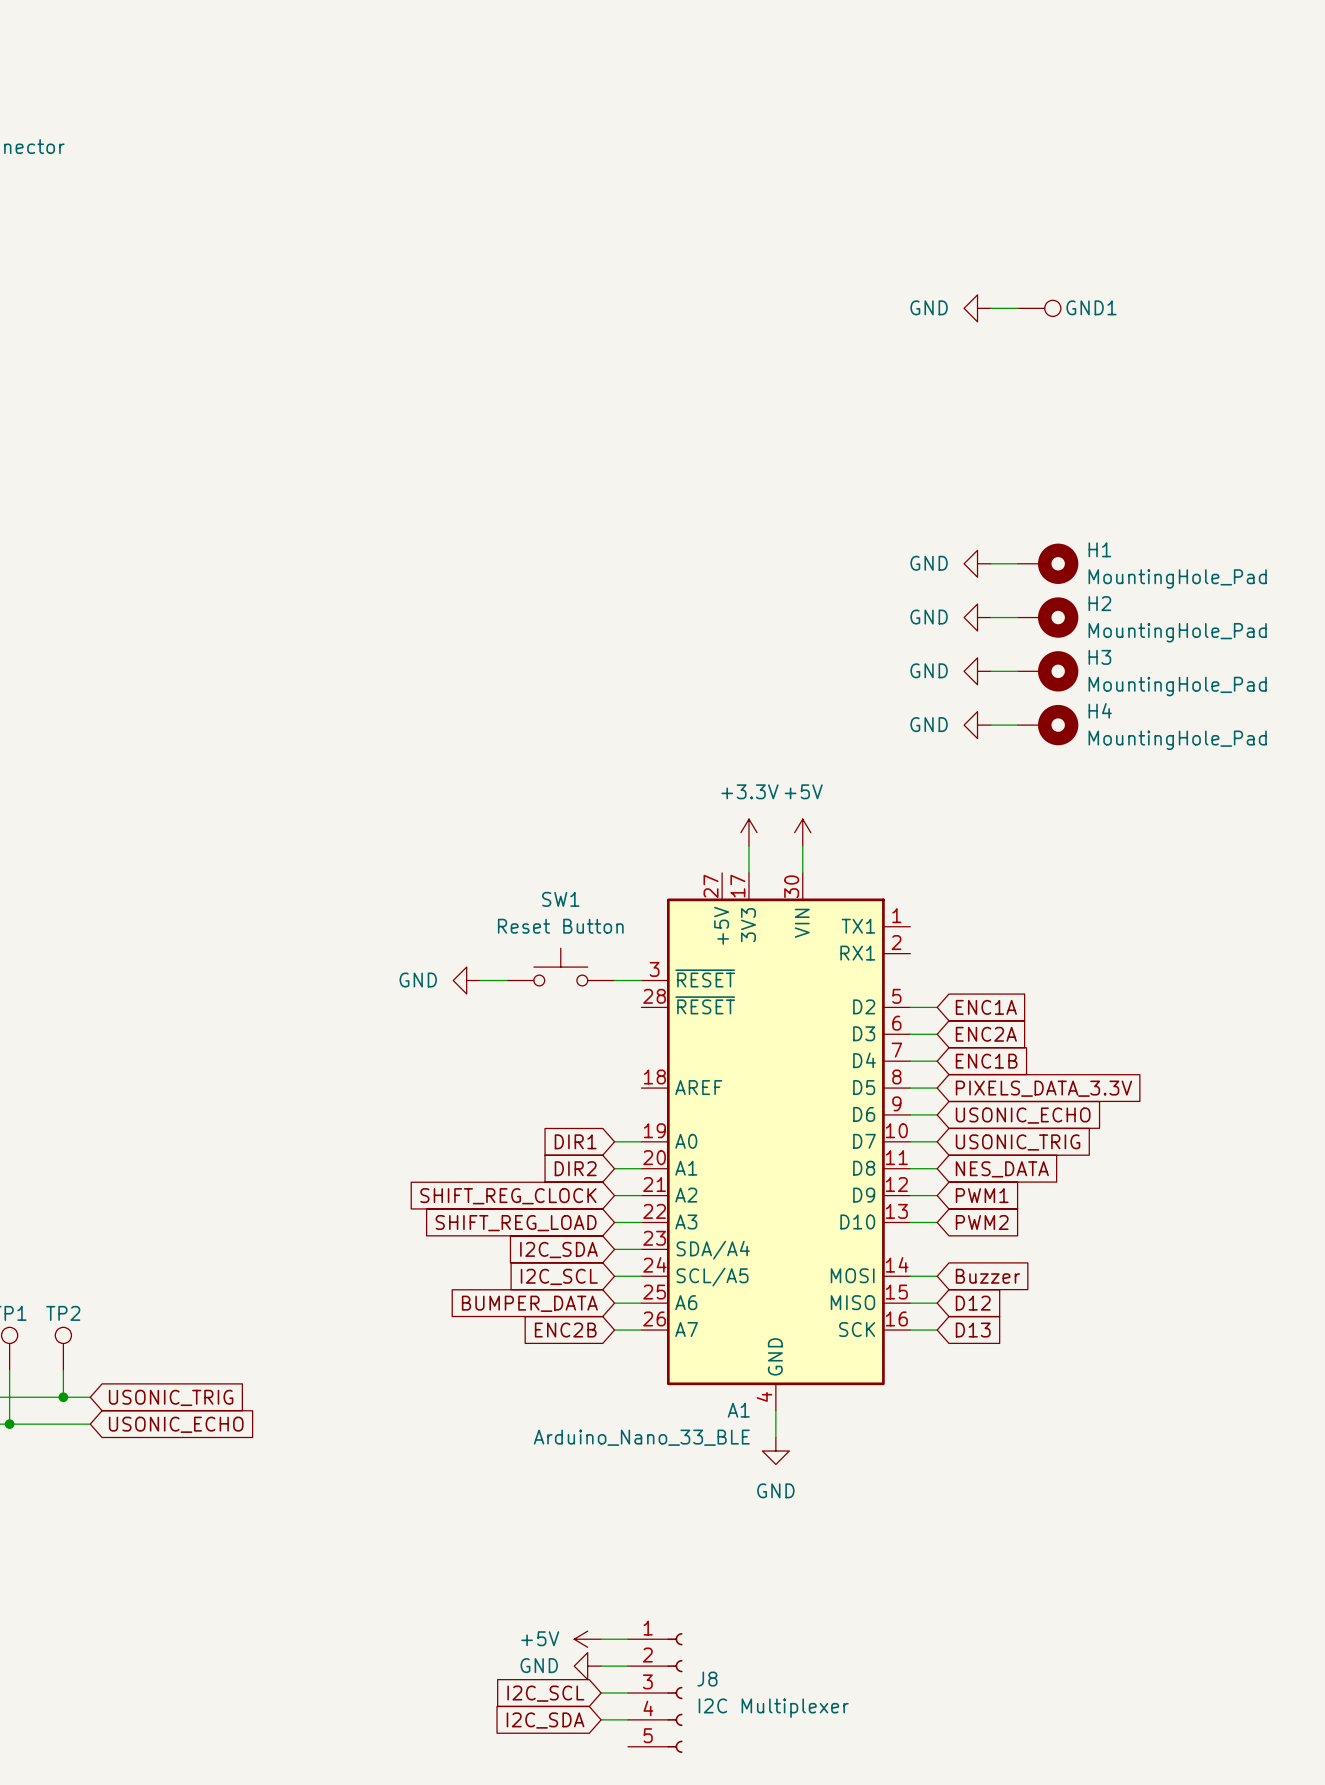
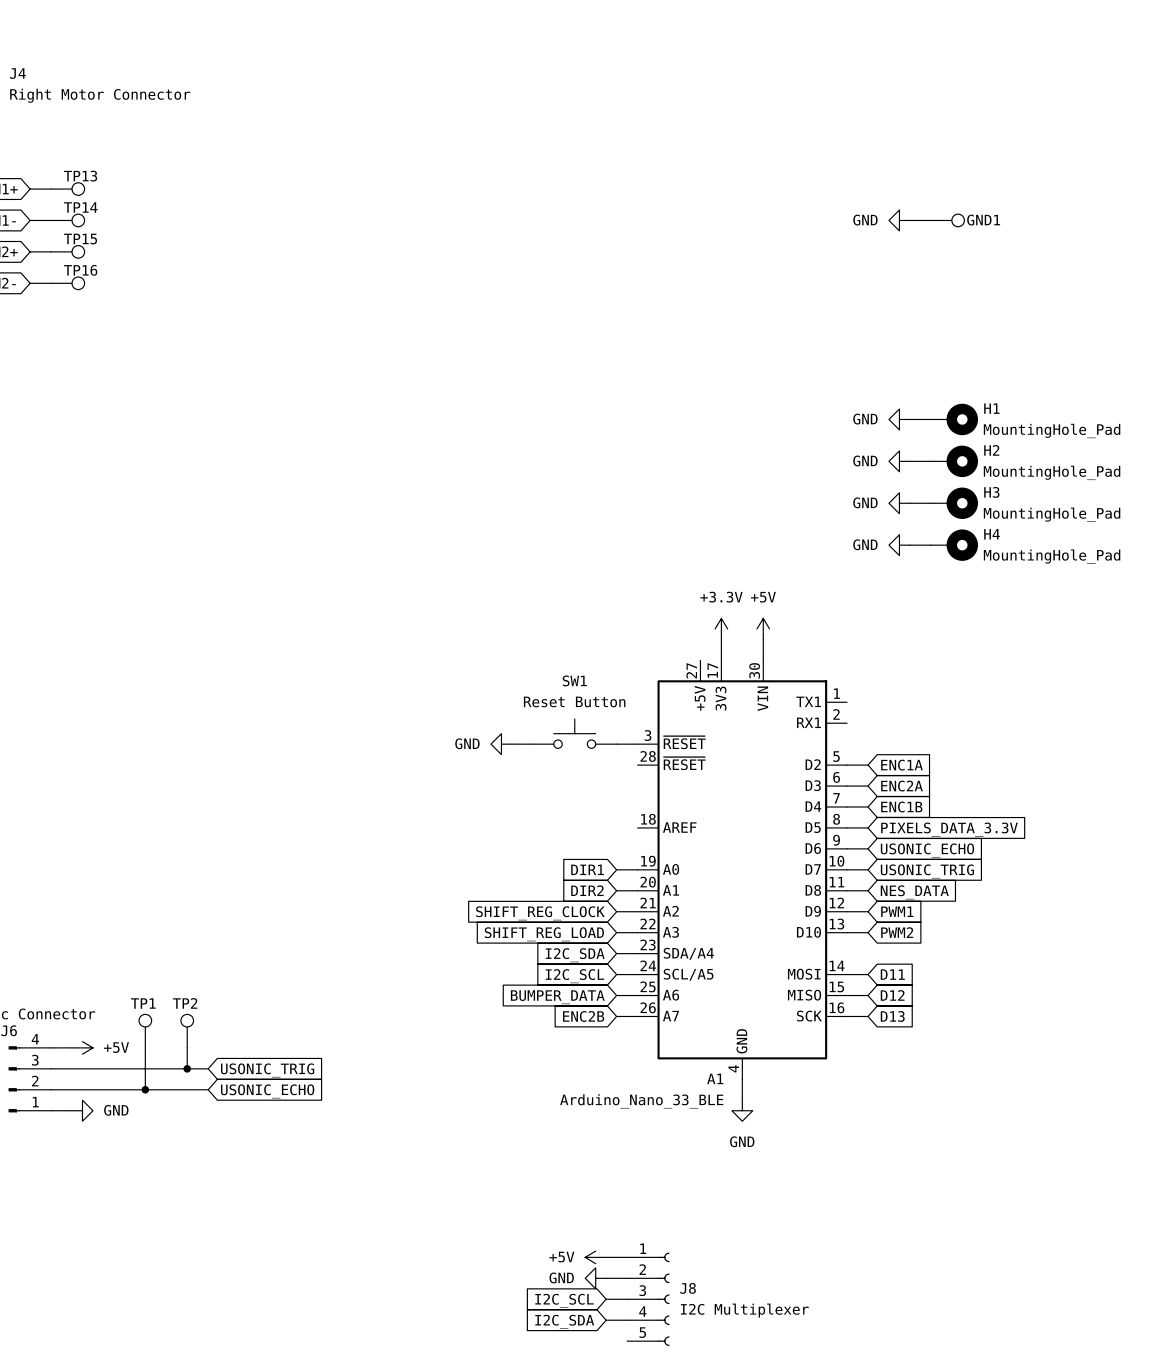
global label: Buzzer (987, 1276) -> D11 (892, 974)

